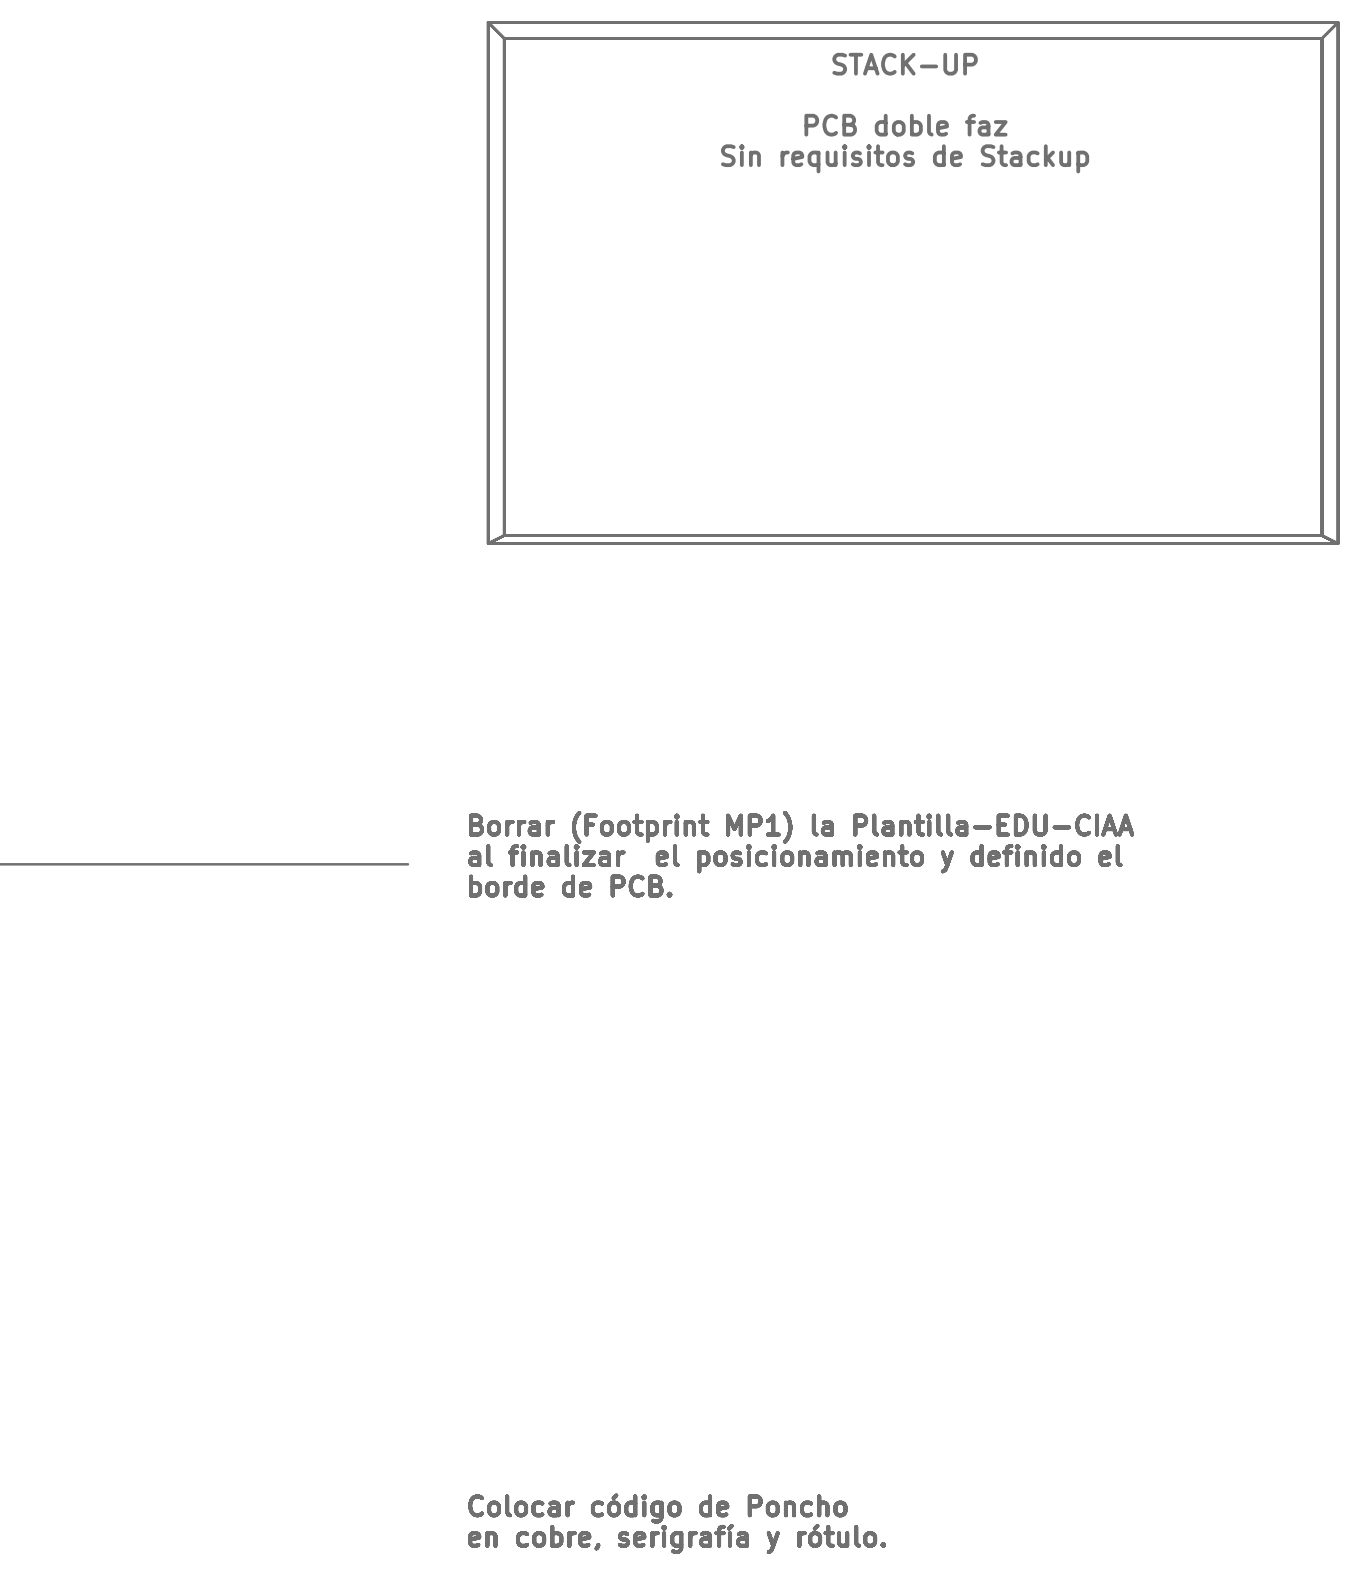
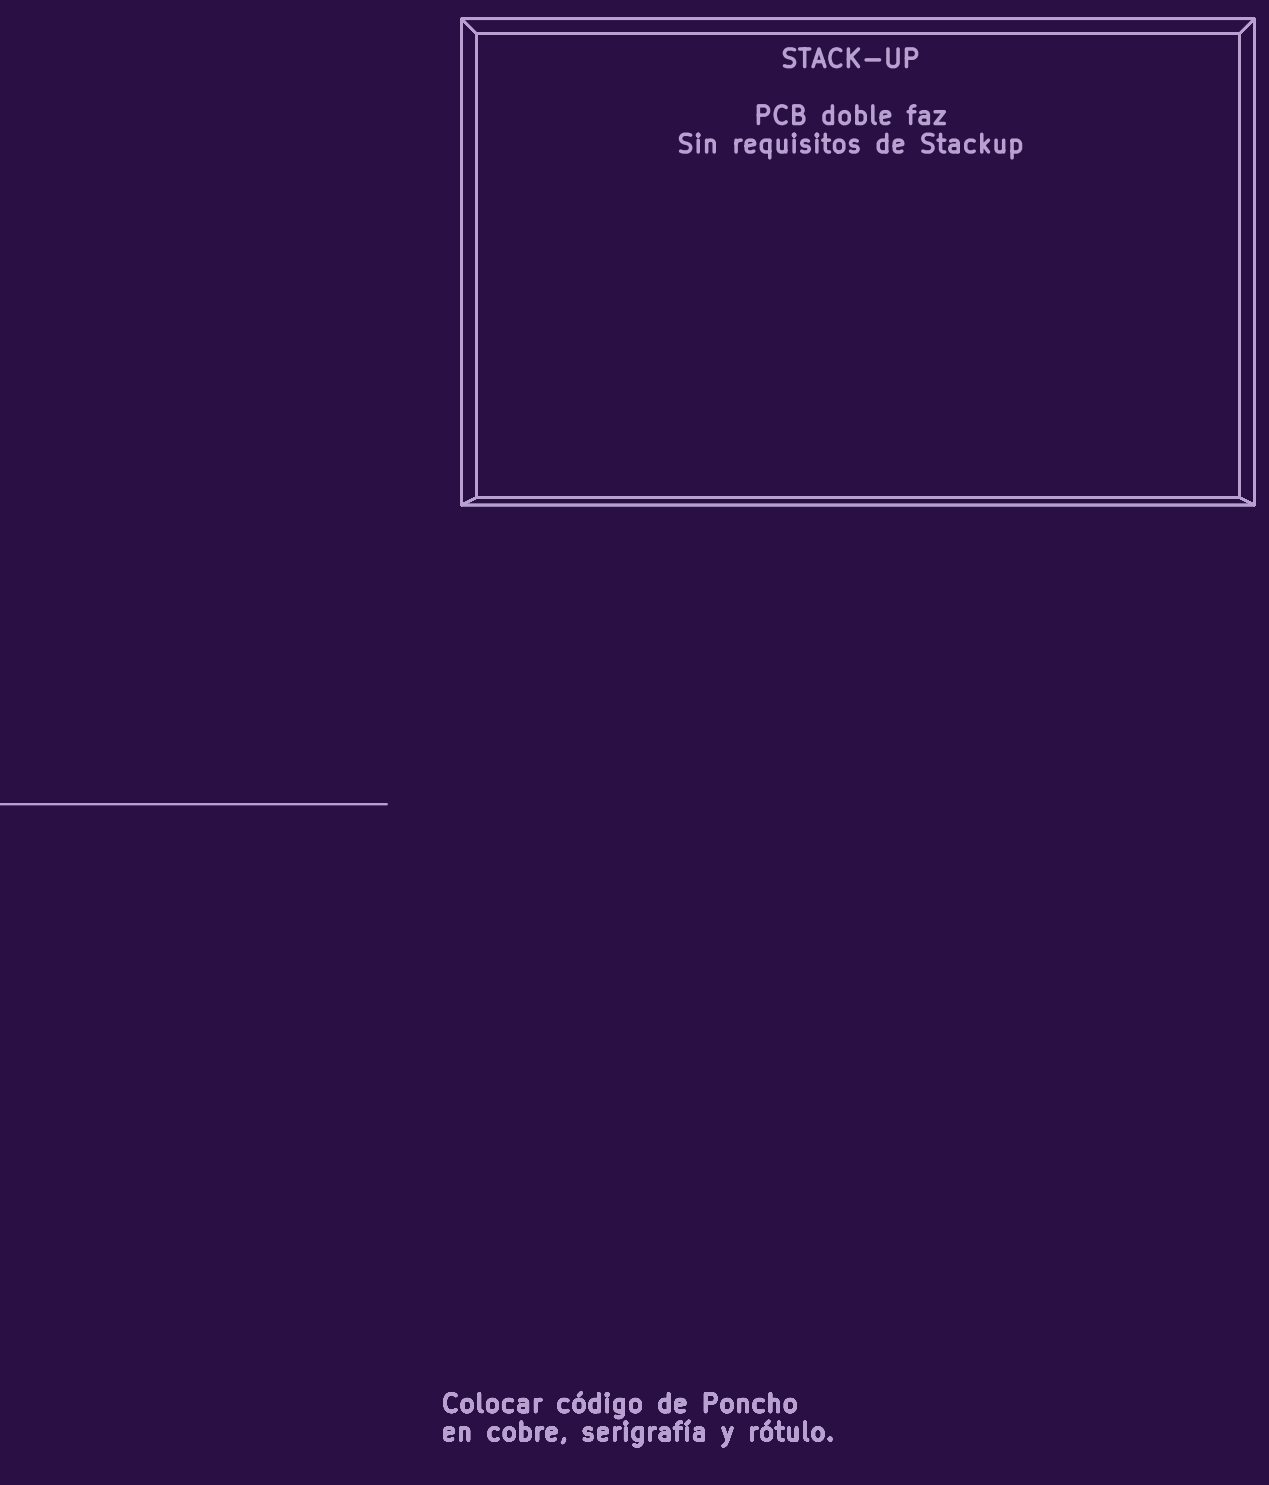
text: Borrar (Footprint MP1) la Plantilla-EDU-CIAA (801, 827) -> none
text: al finalizar el posicionamiento y definido el (795, 858) -> none
text: borde de PCB. (570, 886) -> none

